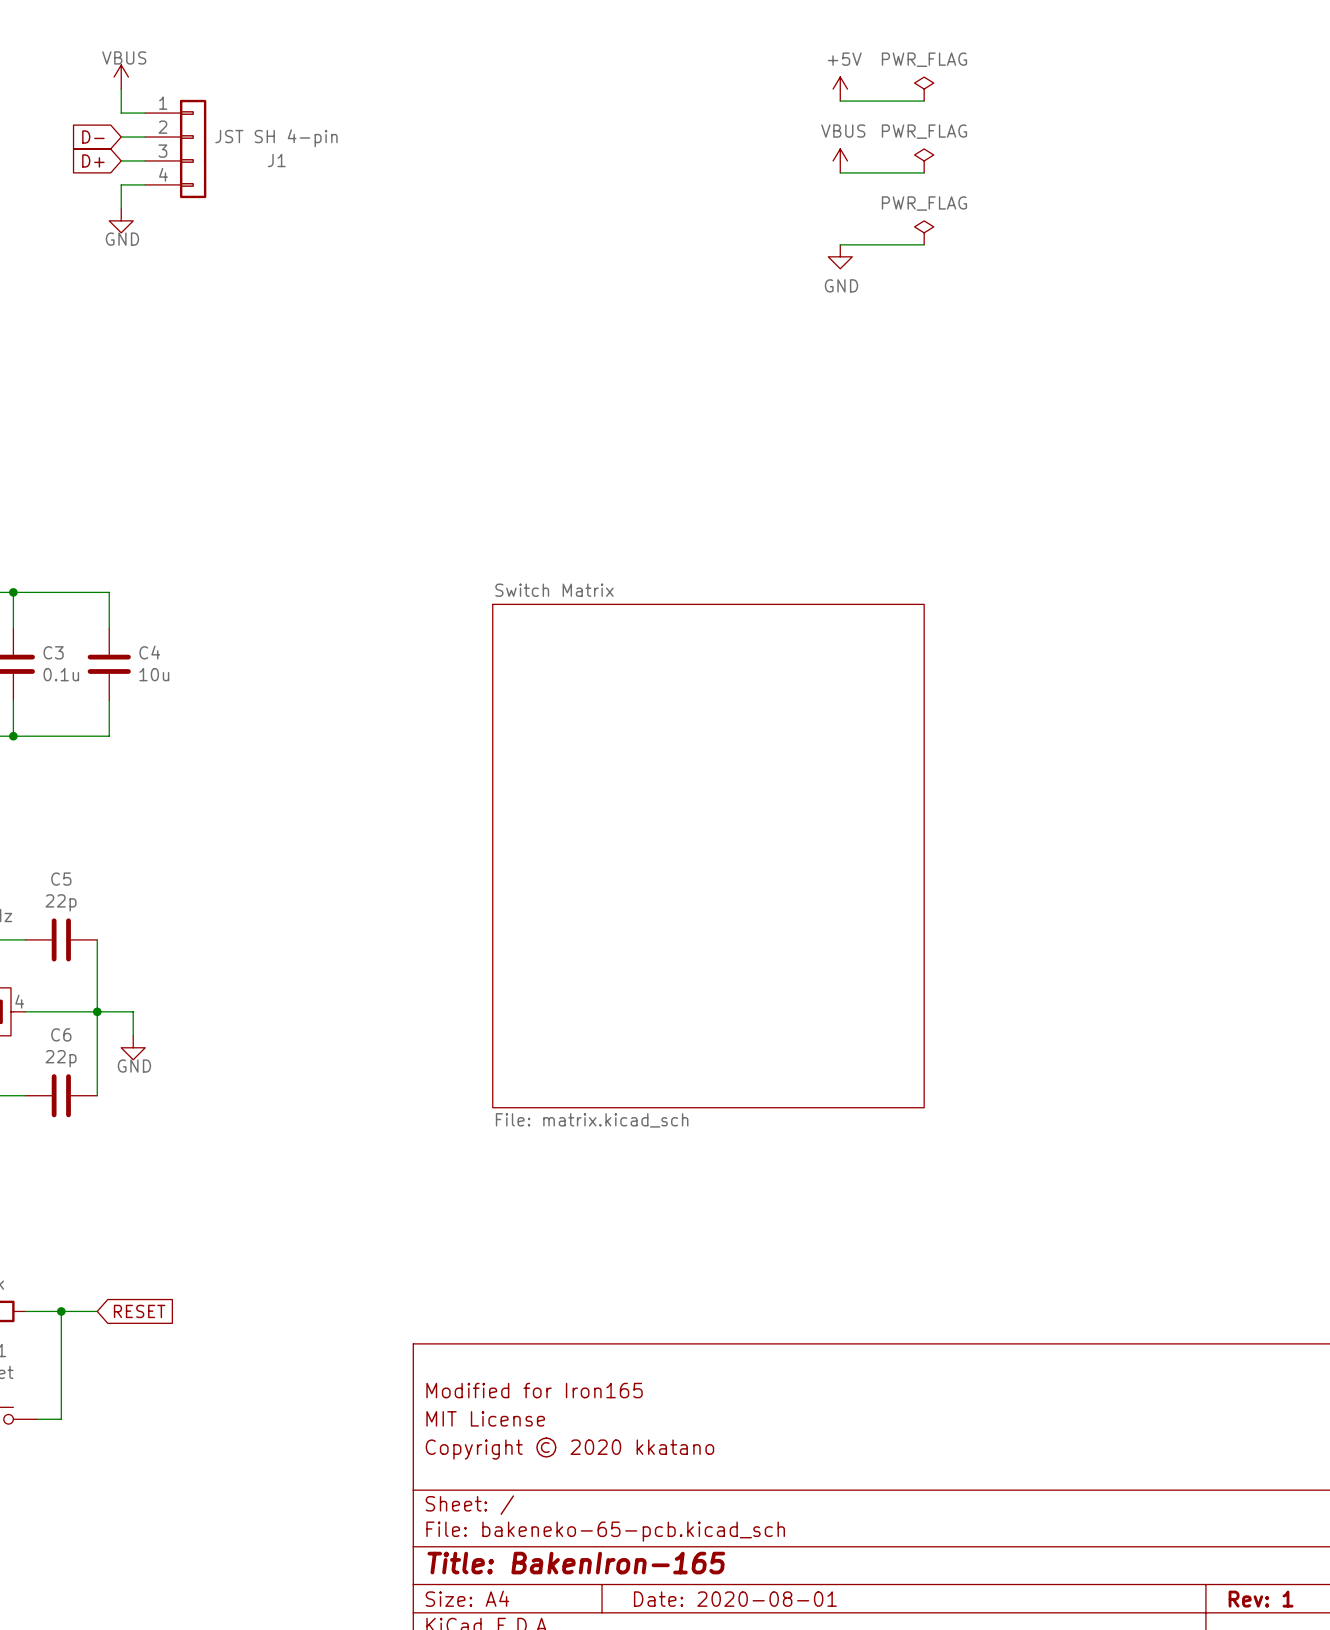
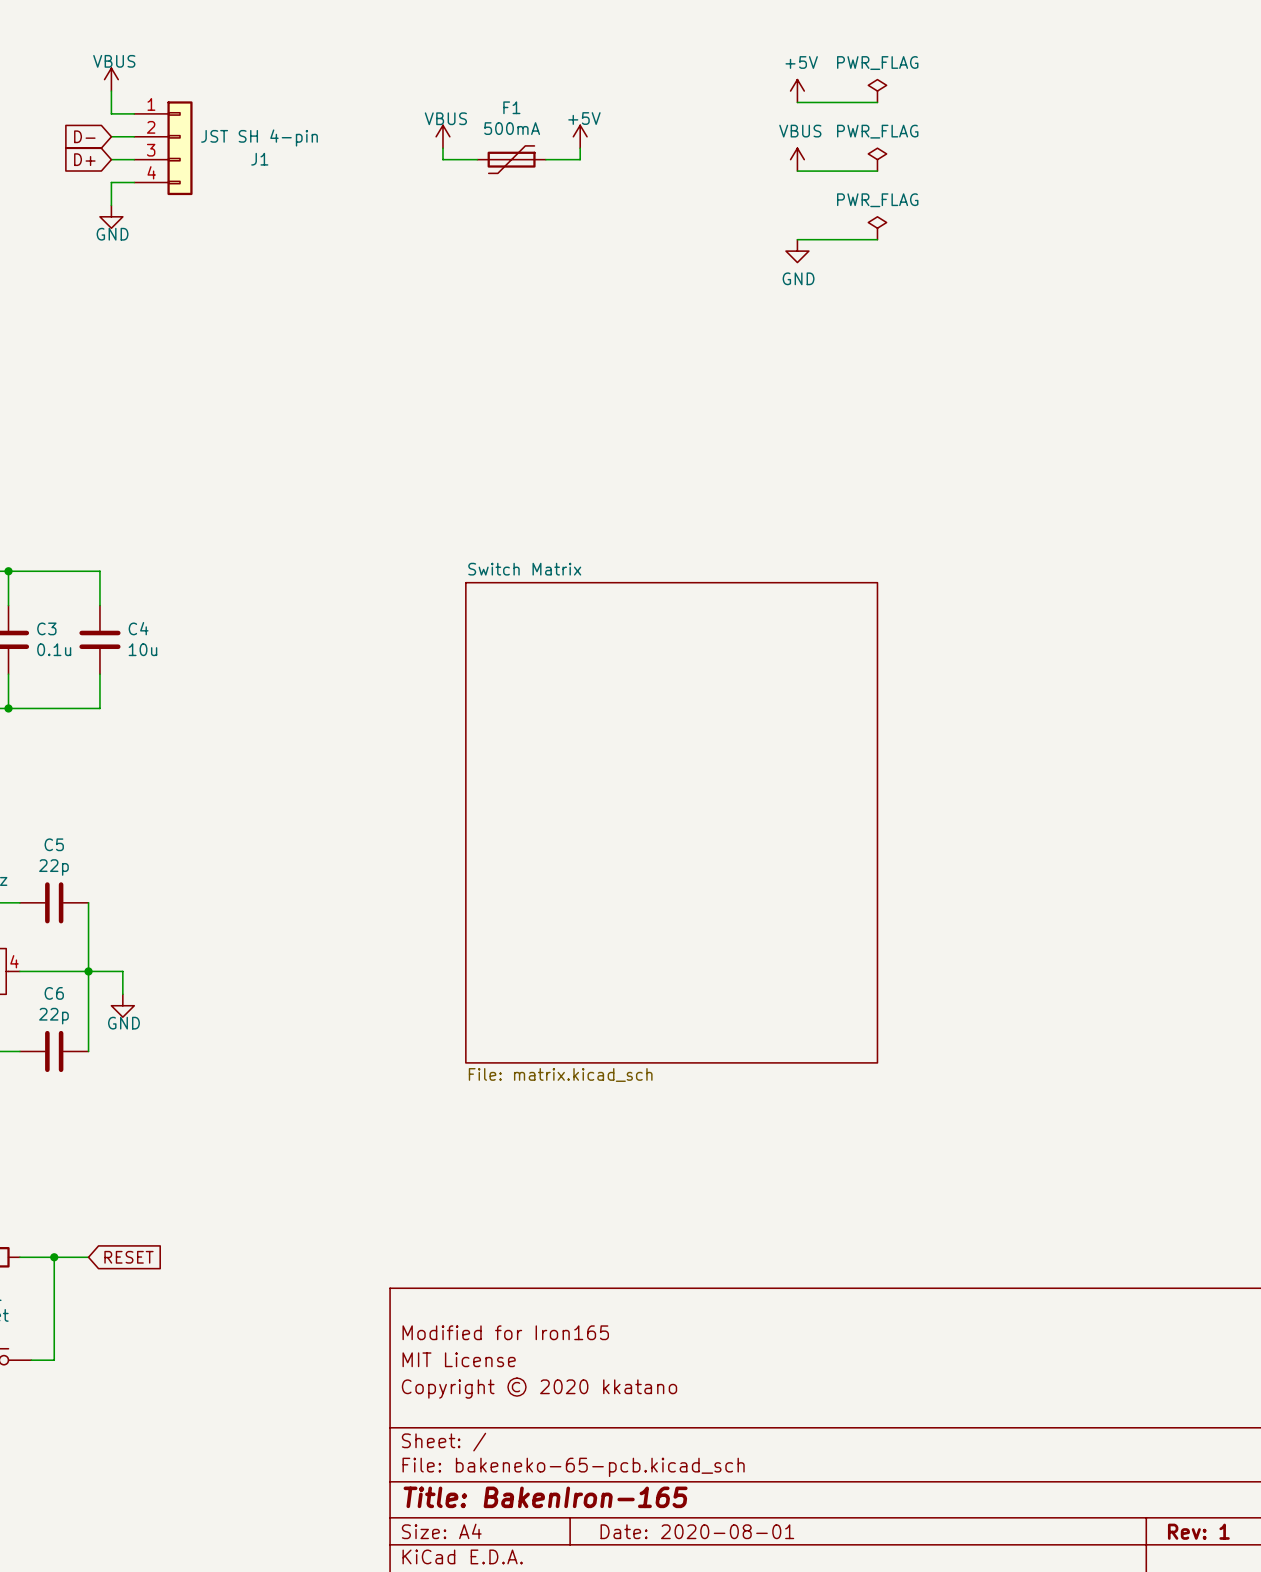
power symbol: none -> VBUS (442, 136)
power symbol: none -> +5V (580, 136)
wire: none -> (442, 148) (442, 159) (477, 159)
wire: none -> (580, 148) (580, 159) (545, 159)
F1: none -> 500mA (511, 159)

